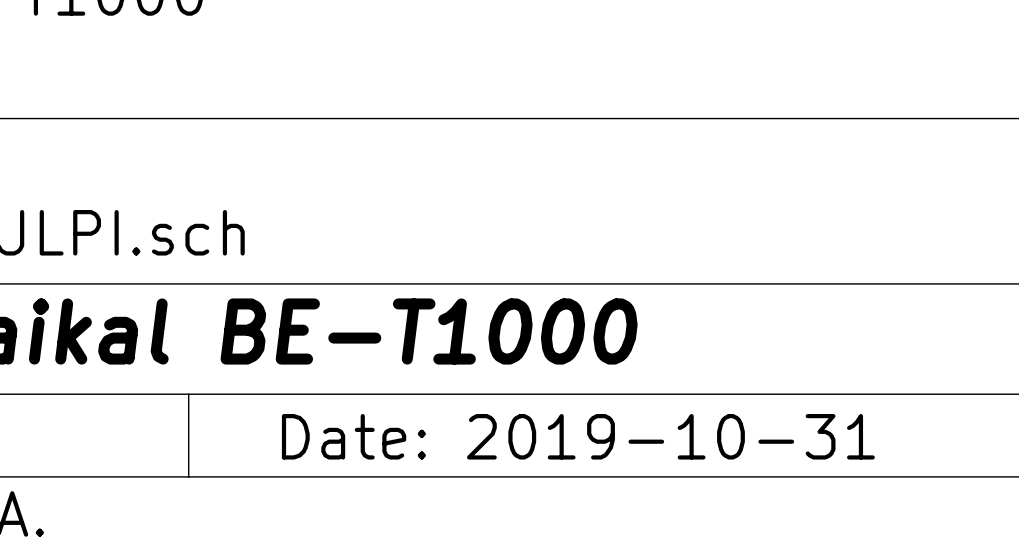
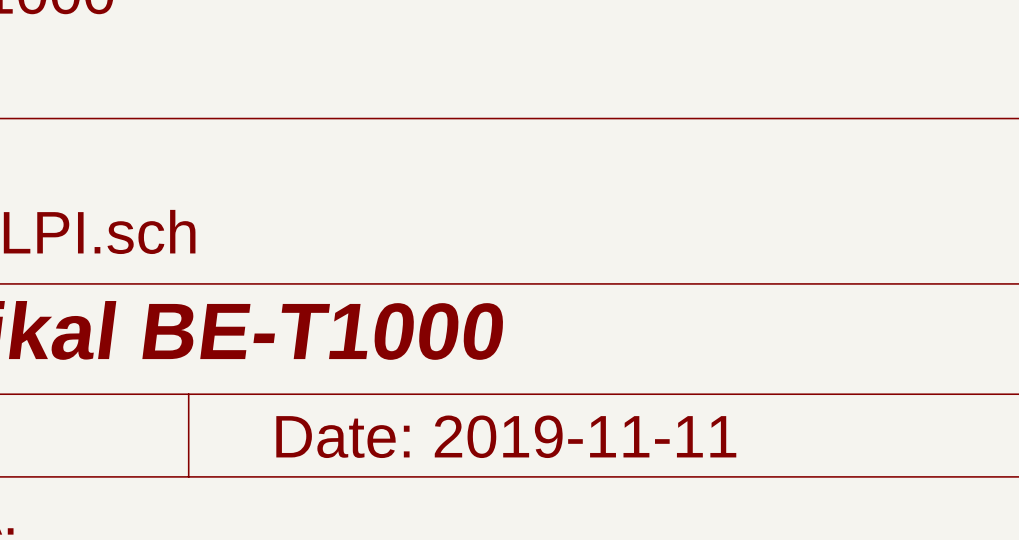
title block: Date: 2019-10-31 (578, 436) -> Date: 2019-11-11 (506, 436)

